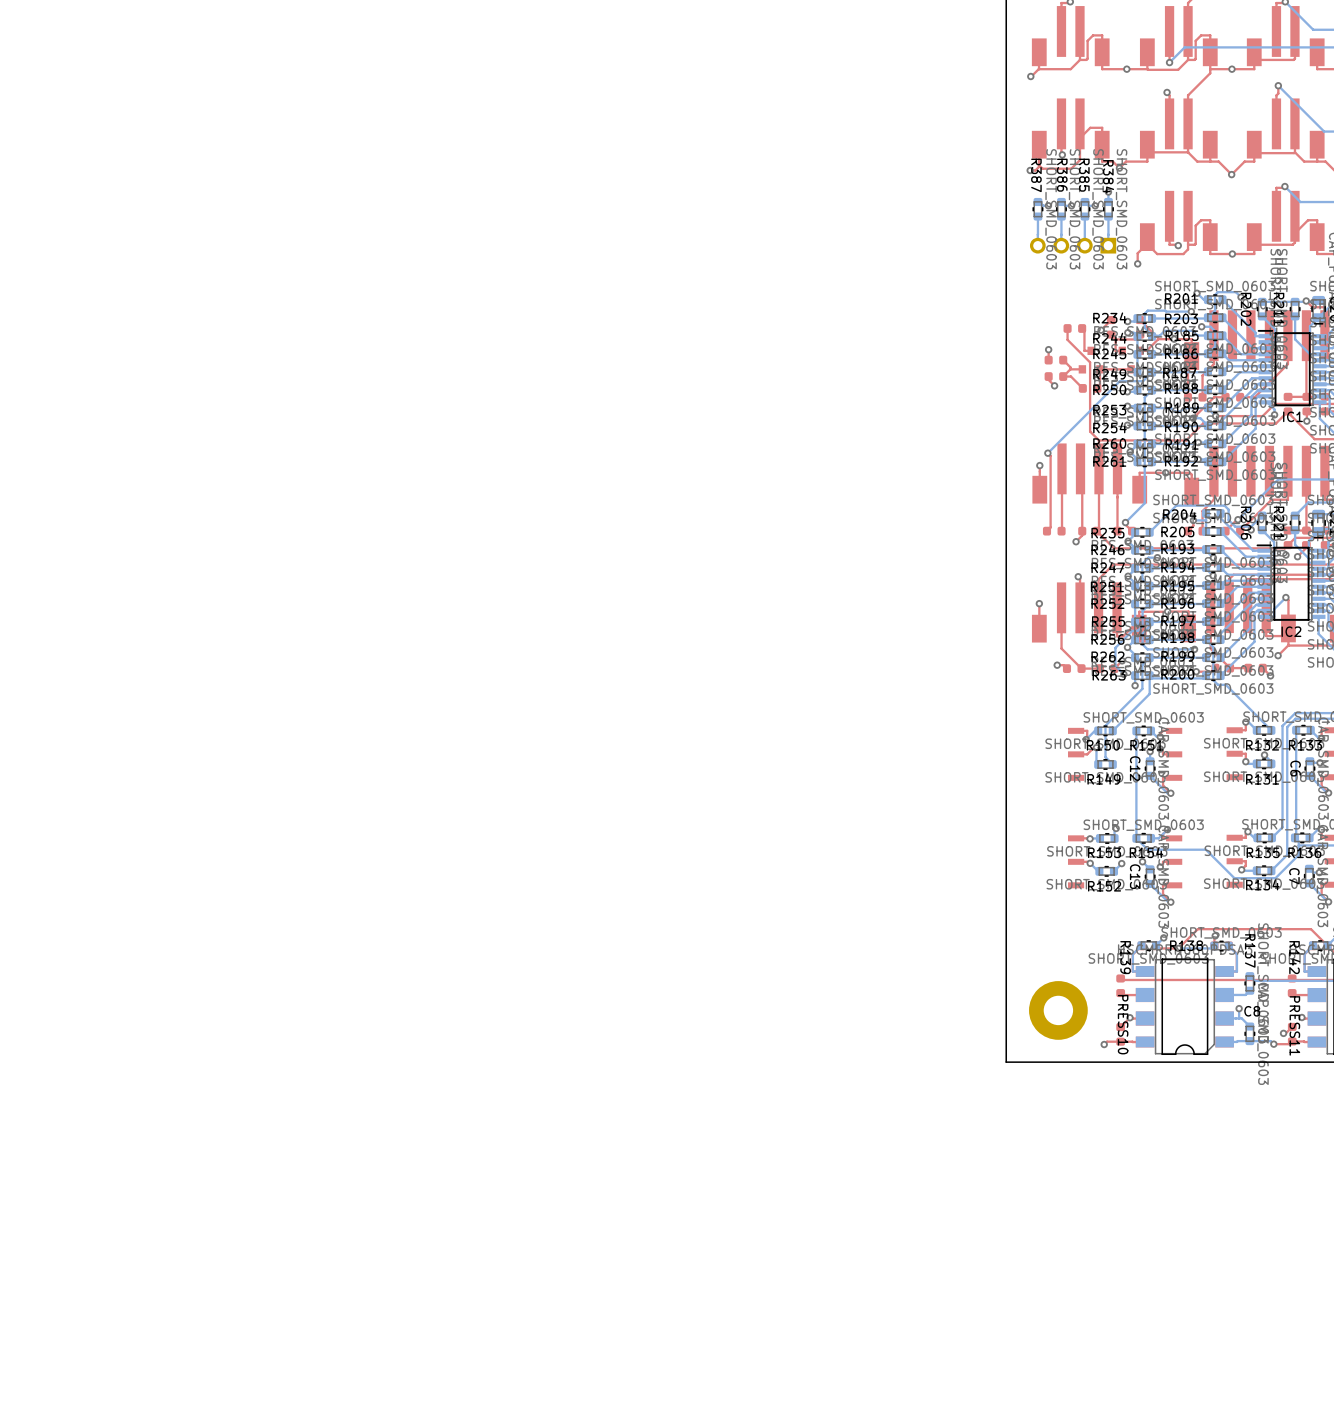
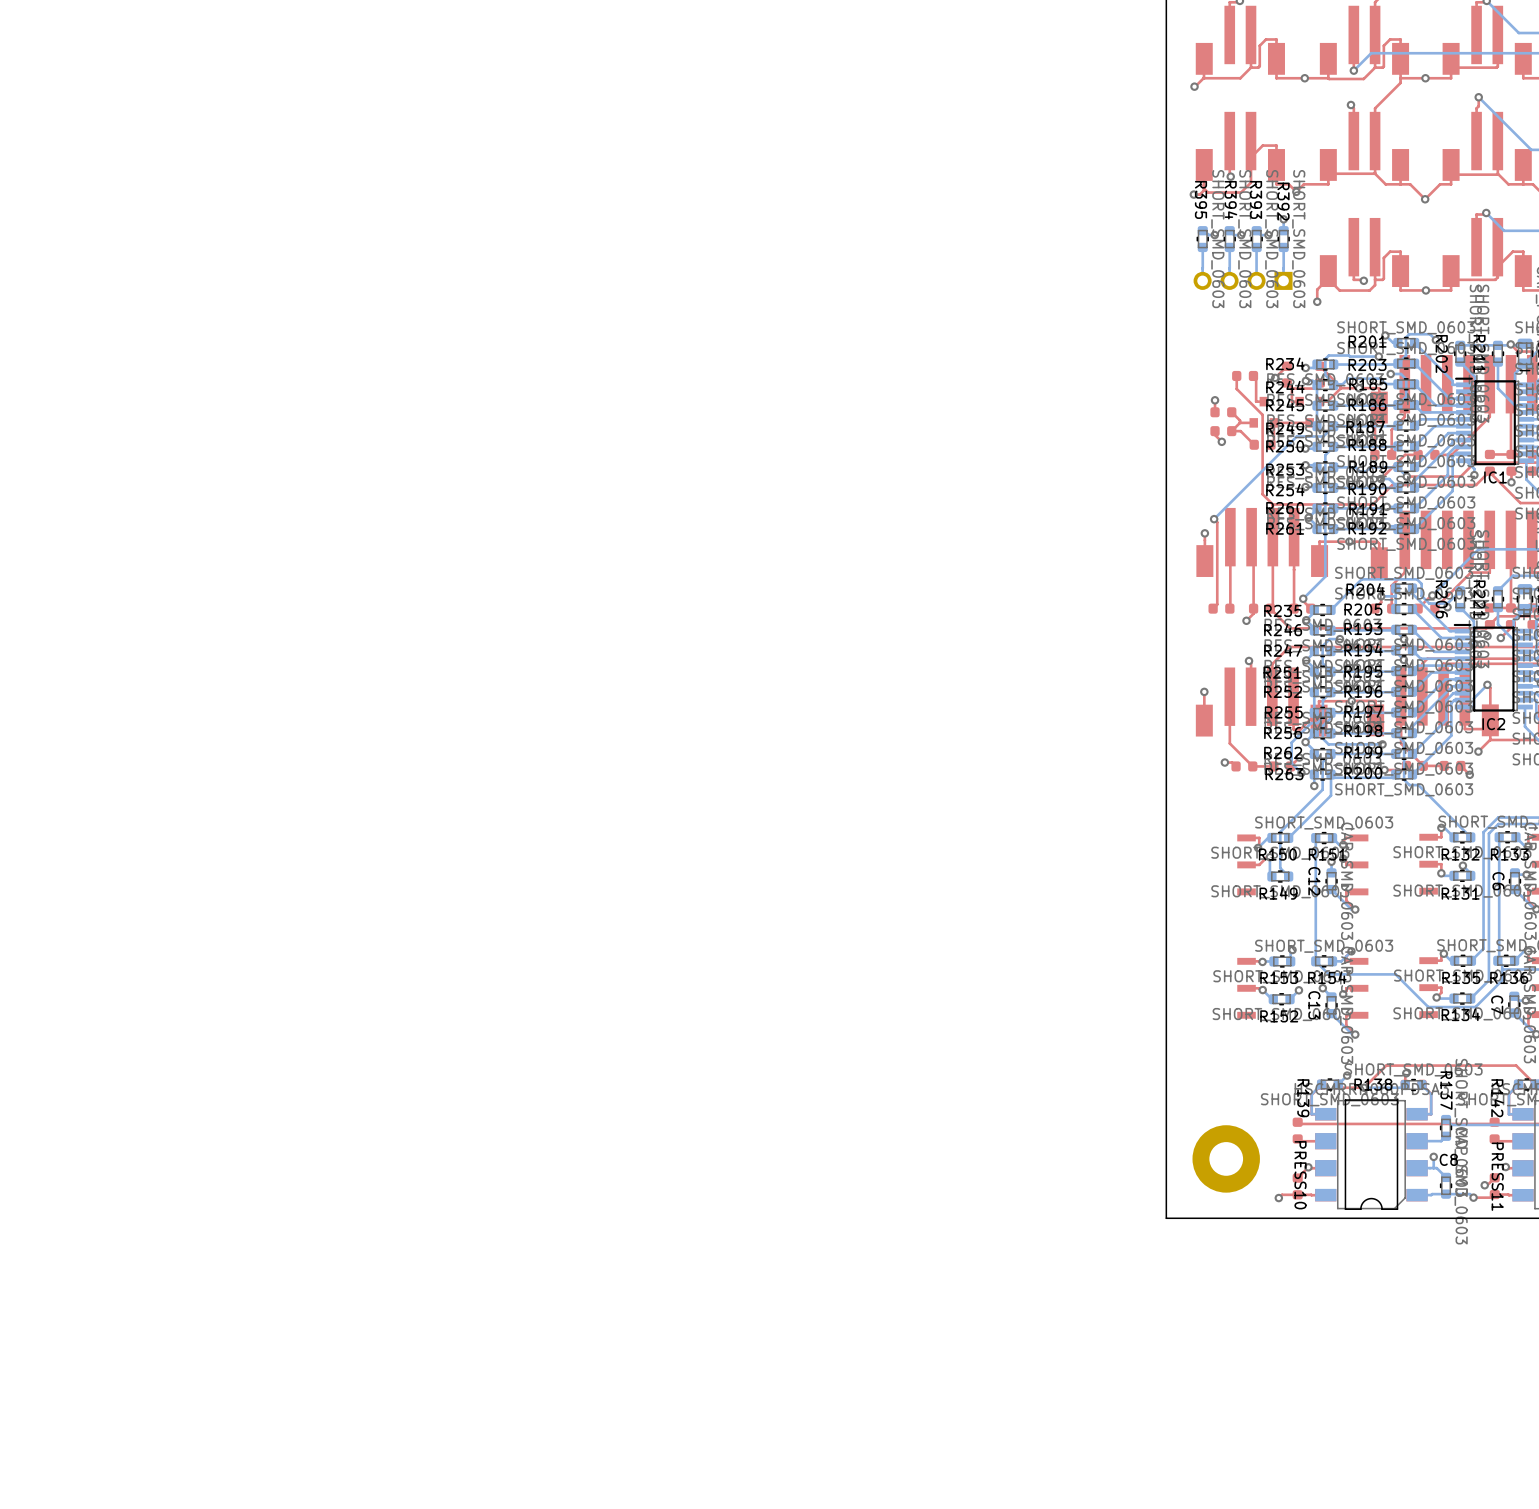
R387 name: R387 (1036, 175) -> R395 (1200, 199)
R386 name: R386 (1062, 175) -> R394 (1230, 200)
R385 name: R385 (1084, 175) -> R393 (1256, 199)
R384 name: R384 (1108, 176) -> R392 (1283, 201)

